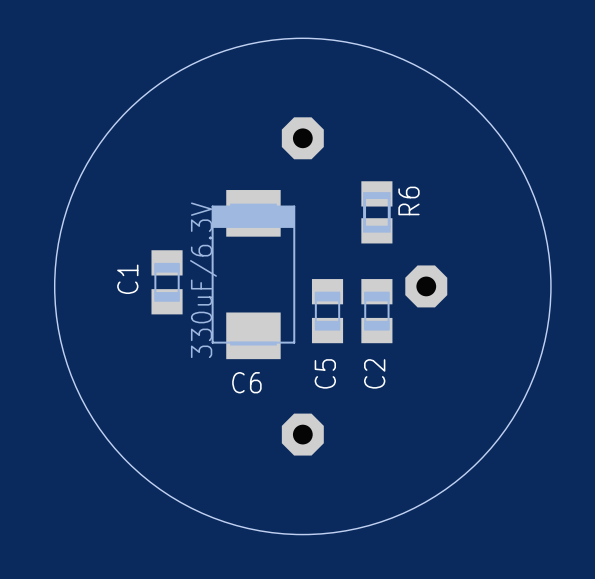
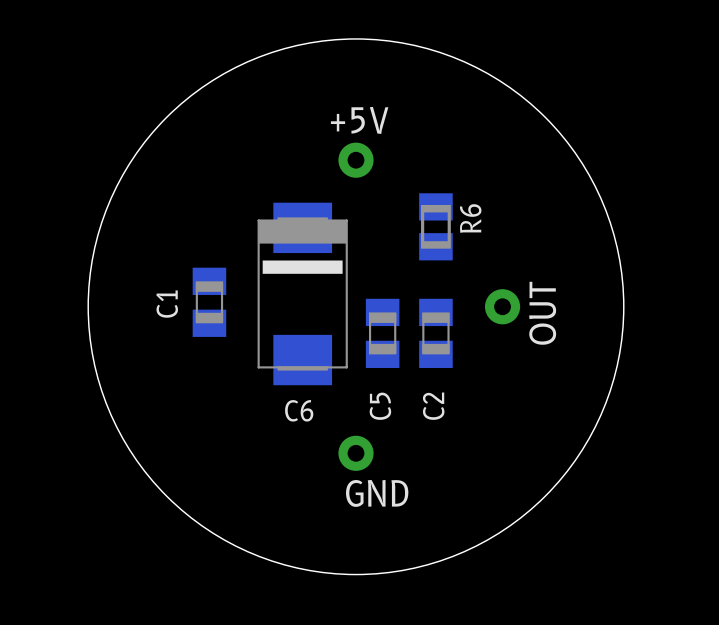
part: (302, 138) -> none
+5V: none -> (355, 160)
drawing: none -> [262, 260, 343, 274]
C6 value: 330uF/6.3V (203, 280) -> none
part: (426, 286) -> none
OUT: none -> (502, 306)
GND: none -> (355, 453)
part: (302, 434) -> none

